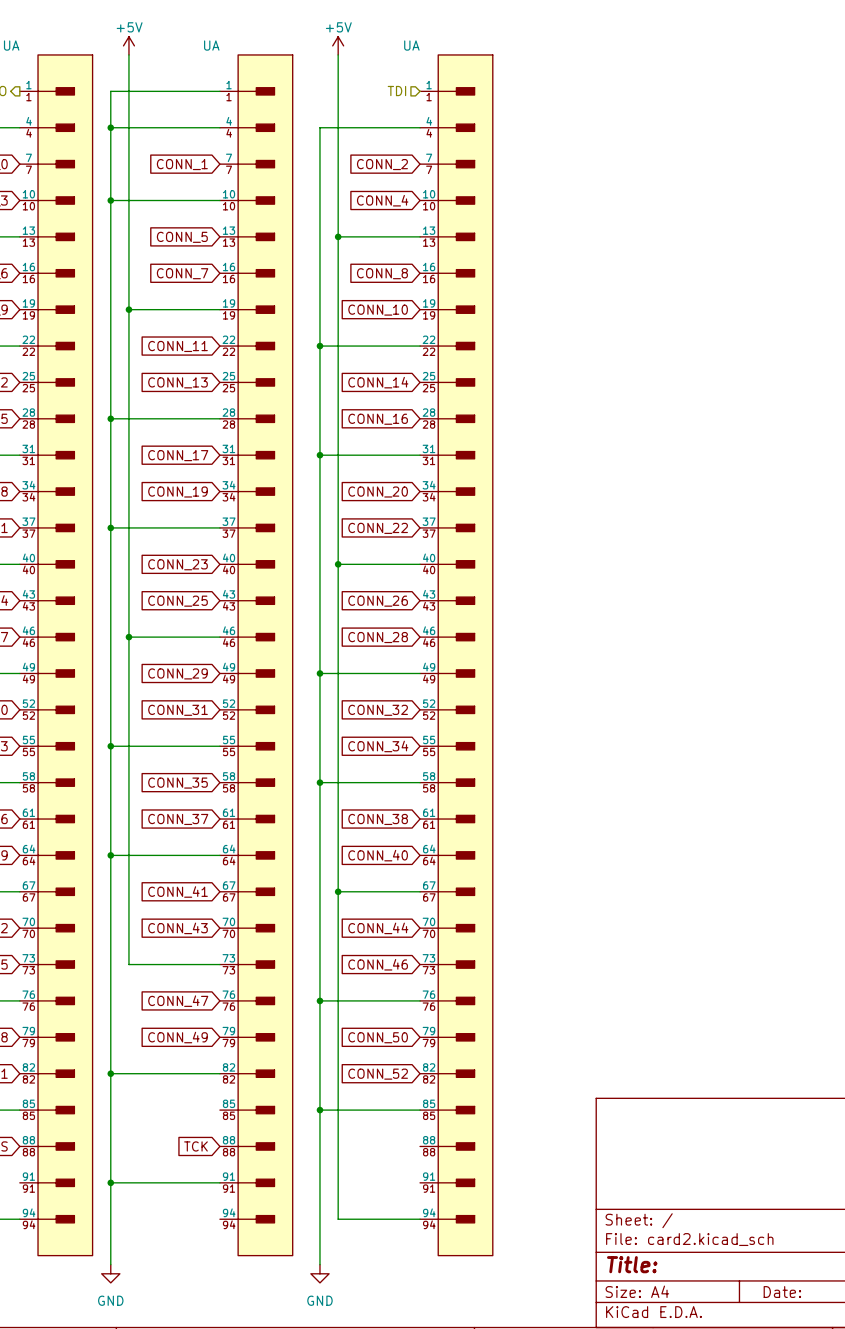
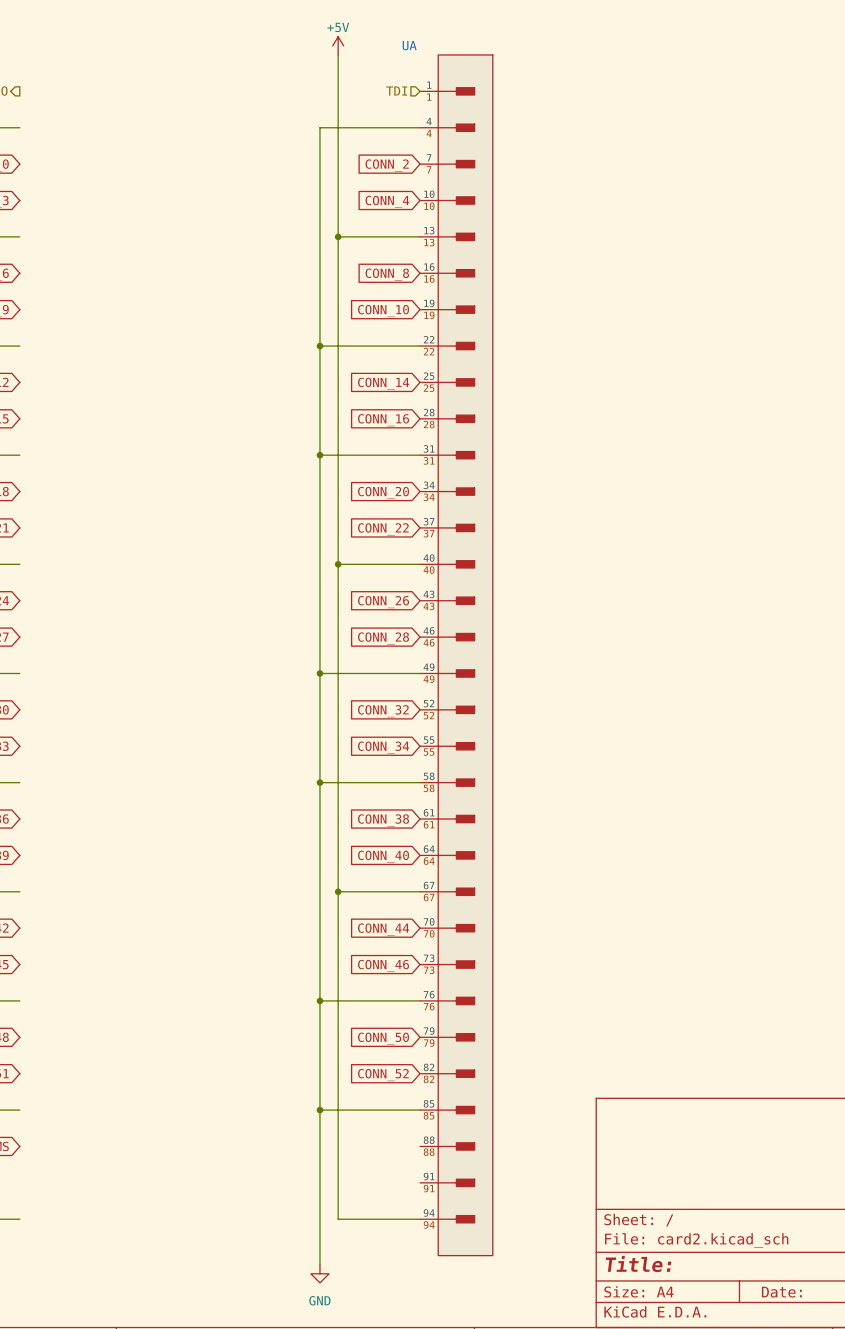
power symbol: +5V (128, 45) -> none
wire: (128, 54) (128, 964) (219, 964) -> none
wire: (219, 91) (110, 91) (110, 1264) -> none
wire: (110, 127) (219, 127) -> none
junction: (110, 127) -> none
global label: CONN_1 (182, 164) -> none
wire: (110, 200) (219, 200) -> none
junction: (110, 200) -> none
global label: CONN_5 (182, 237) -> none
global label: CONN_7 (182, 273) -> none
wire: (128, 309) (219, 309) -> none
junction: (128, 309) -> none
global label: CONN_11 (178, 346) -> none
global label: CONN_13 (178, 382) -> none
wire: (110, 418) (219, 418) -> none
junction: (110, 418) -> none
global label: CONN_17 (178, 455) -> none
global label: CONN_19 (178, 492) -> none
wire: (110, 527) (219, 527) -> none
junction: (110, 527) -> none
global label: CONN_23 (178, 564) -> none
global label: CONN_25 (178, 601) -> none
wire: (128, 637) (219, 637) -> none
junction: (128, 637) -> none
UA: (56, 655) -> none
UA: (256, 655) -> none
global label: CONN_29 (178, 673) -> none
global label: CONN_31 (178, 710) -> none
wire: (110, 746) (219, 746) -> none
junction: (110, 746) -> none
global label: CONN_35 (178, 783) -> none
global label: CONN_37 (178, 819) -> none
wire: (110, 855) (219, 855) -> none
junction: (110, 855) -> none
global label: CONN_41 (178, 892) -> none
global label: CONN_43 (178, 928) -> none
global label: CONN_47 (178, 1001) -> none
global label: CONN_49 (178, 1037) -> none
wire: (110, 1073) (219, 1073) -> none
junction: (110, 1073) -> none
global label: TCK (195, 1146) -> none
wire: (110, 1182) (219, 1182) -> none
junction: (110, 1182) -> none
power symbol: GND (110, 1273) -> none

